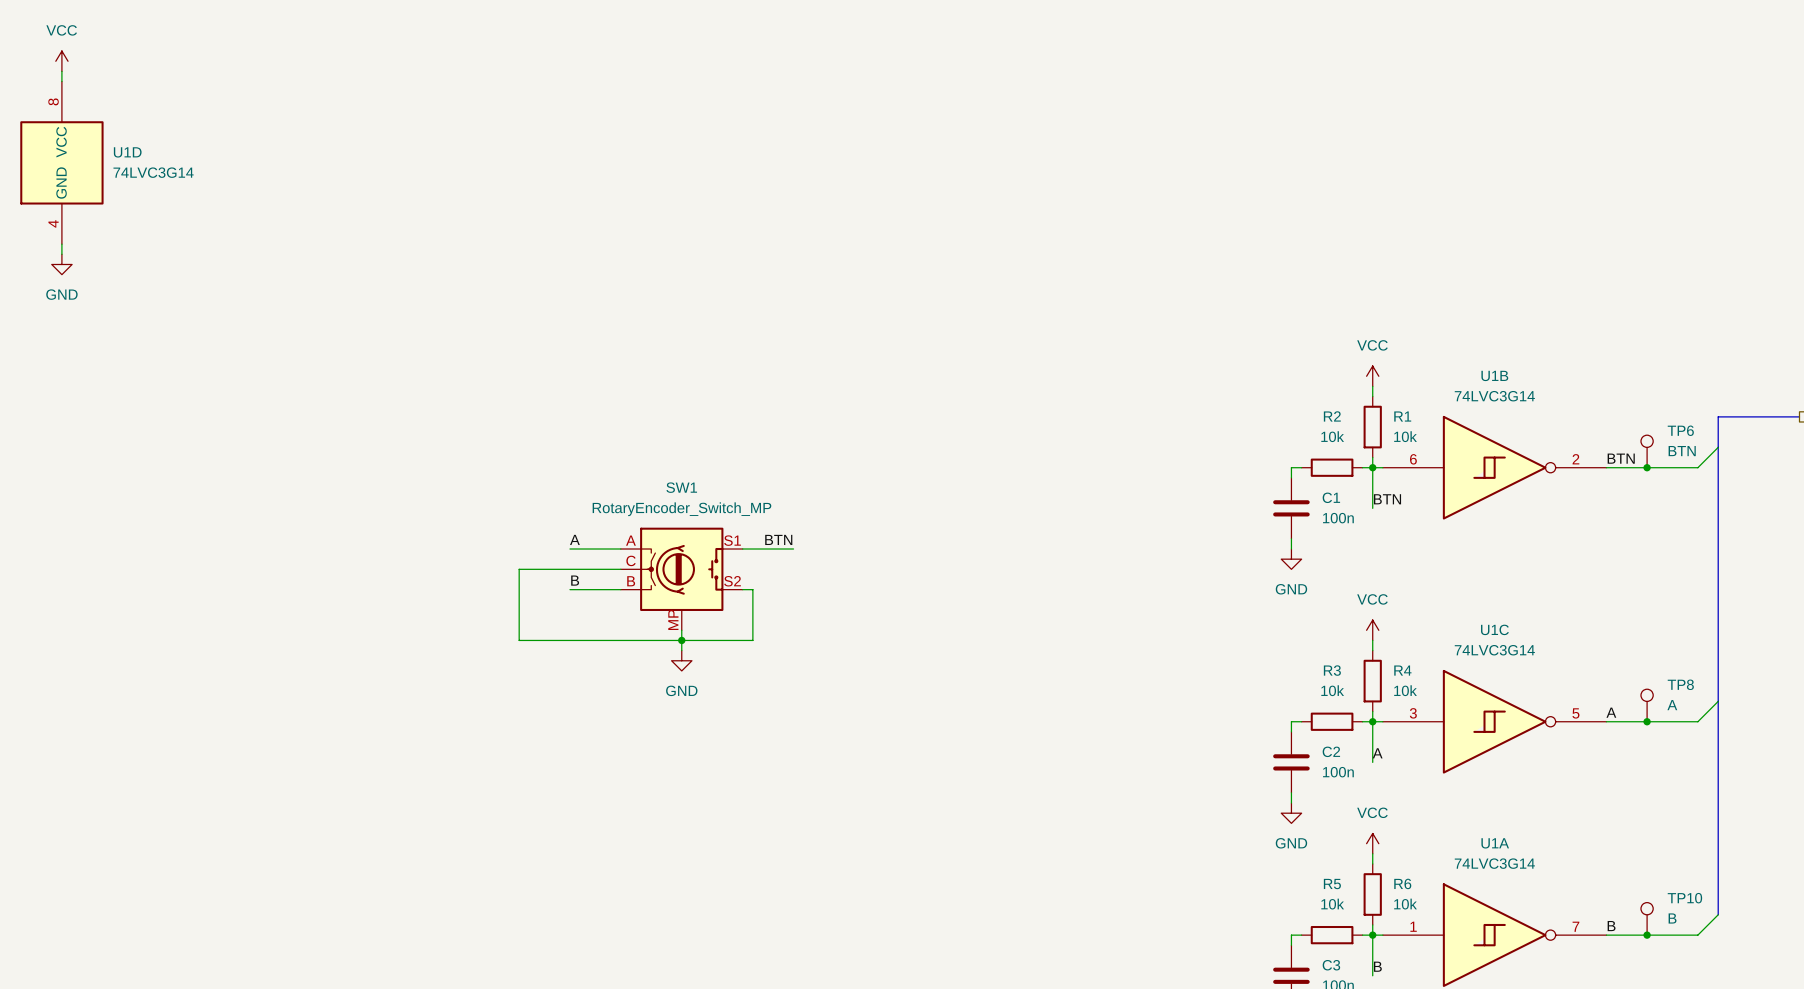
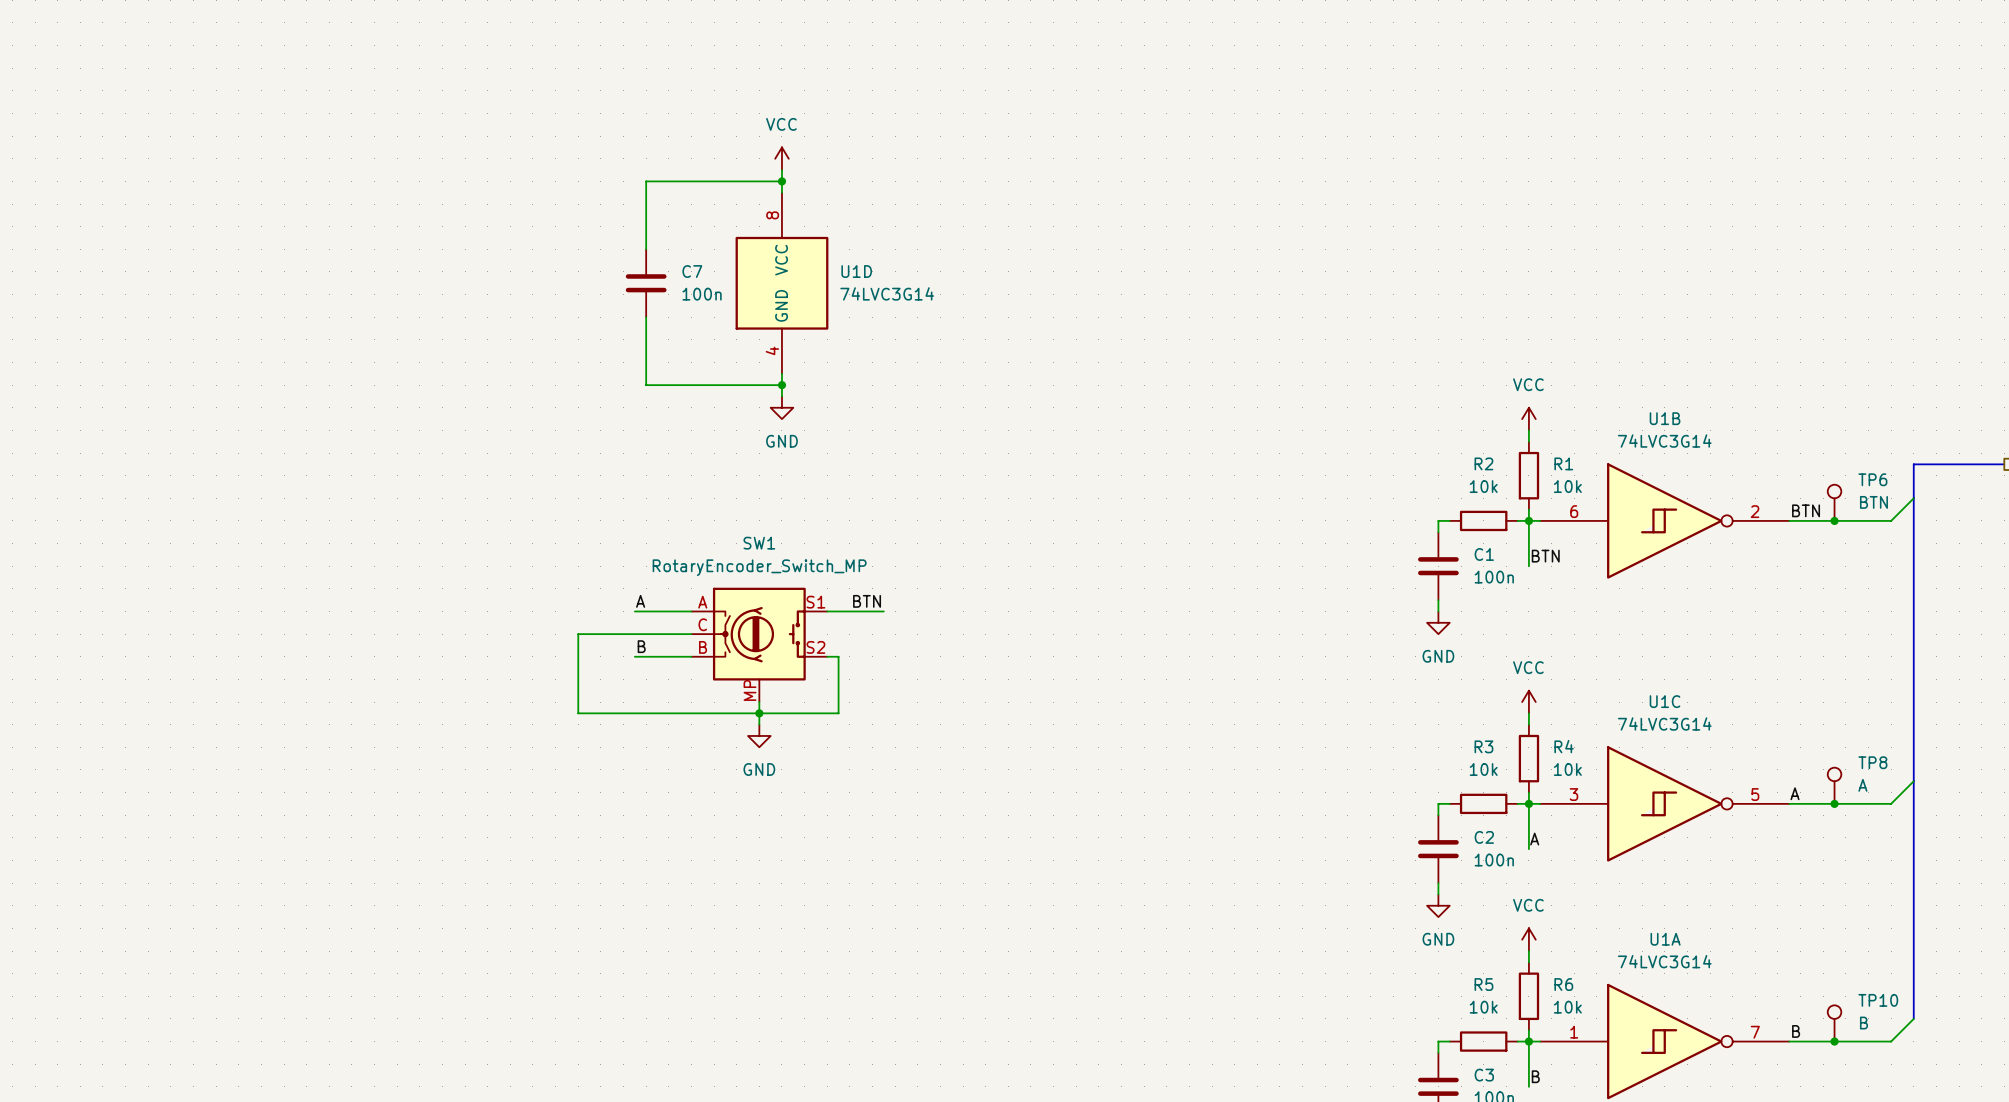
power symbol: VCC (61, 61) -> none
wire: (61, 71) (61, 81) -> none
power symbol: none -> VCC (781, 158)
wire: none -> (781, 170) (781, 192)
U1D position: (61, 162) -> (781, 283)
wire: none -> (781, 181) (646, 181) (646, 249)
junction: none -> (781, 181)
wire: (61, 244) (61, 254) -> none
C7: none -> 100n (646, 283)
power symbol: GND (61, 264) -> none
wire: none -> (646, 317) (646, 385) (781, 385)
wire: none -> (781, 373) (781, 396)
junction: none -> (781, 385)
power symbol: none -> GND (781, 407)

